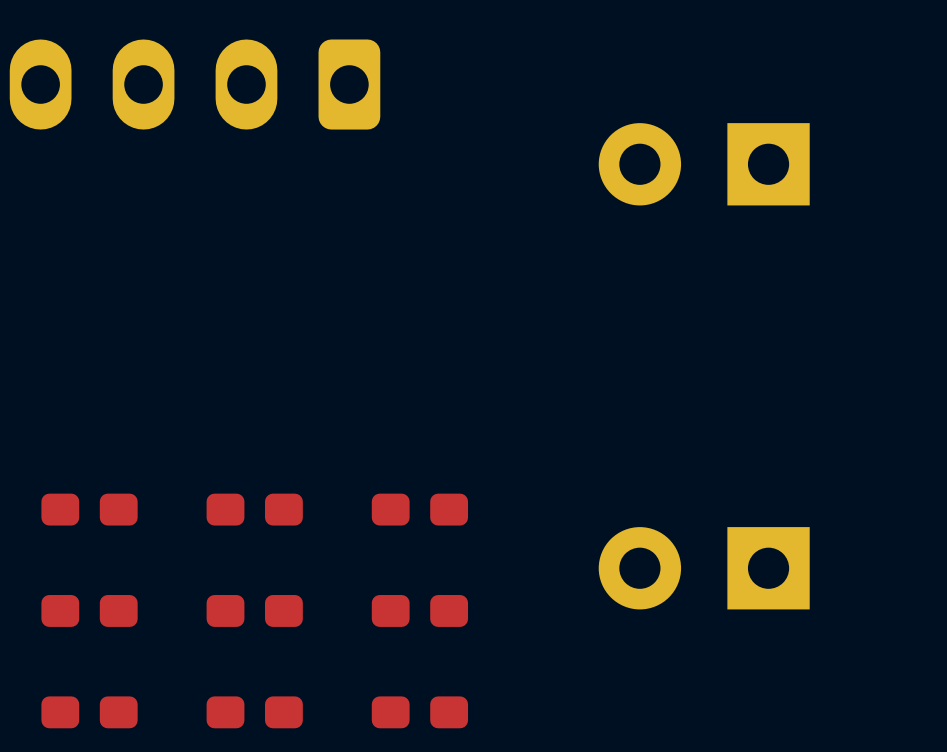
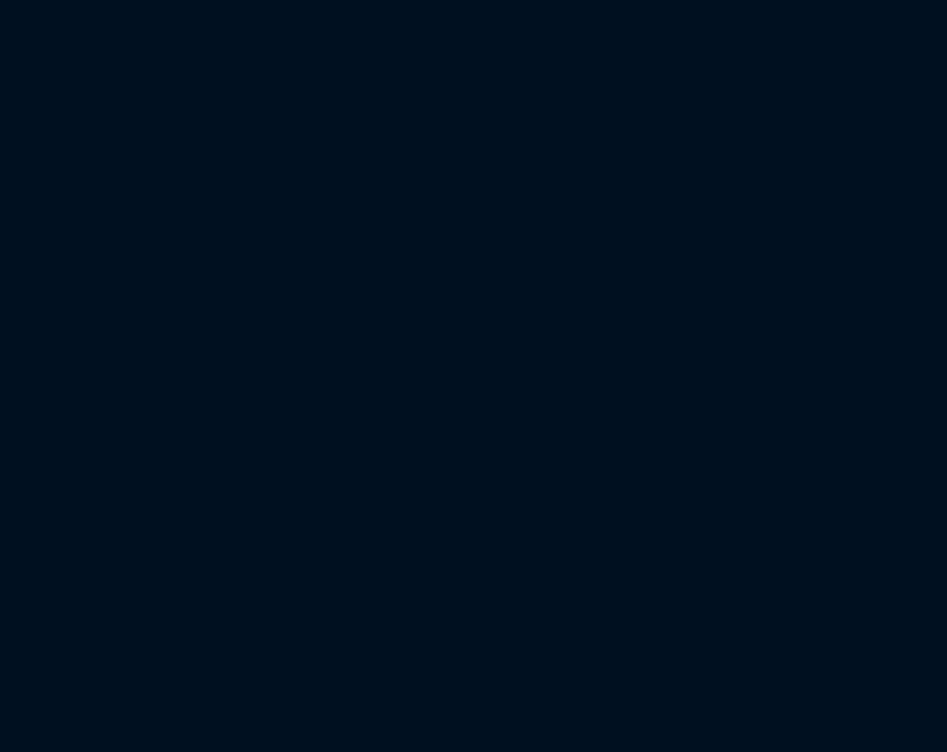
part: (195, 84) -> none
part: (704, 164) -> none
part: (89, 509) -> none
part: (254, 509) -> none
part: (419, 509) -> none
part: (704, 568) -> none
part: (89, 610) -> none
part: (254, 610) -> none
part: (419, 610) -> none
part: (89, 712) -> none
part: (254, 712) -> none
part: (419, 712) -> none

